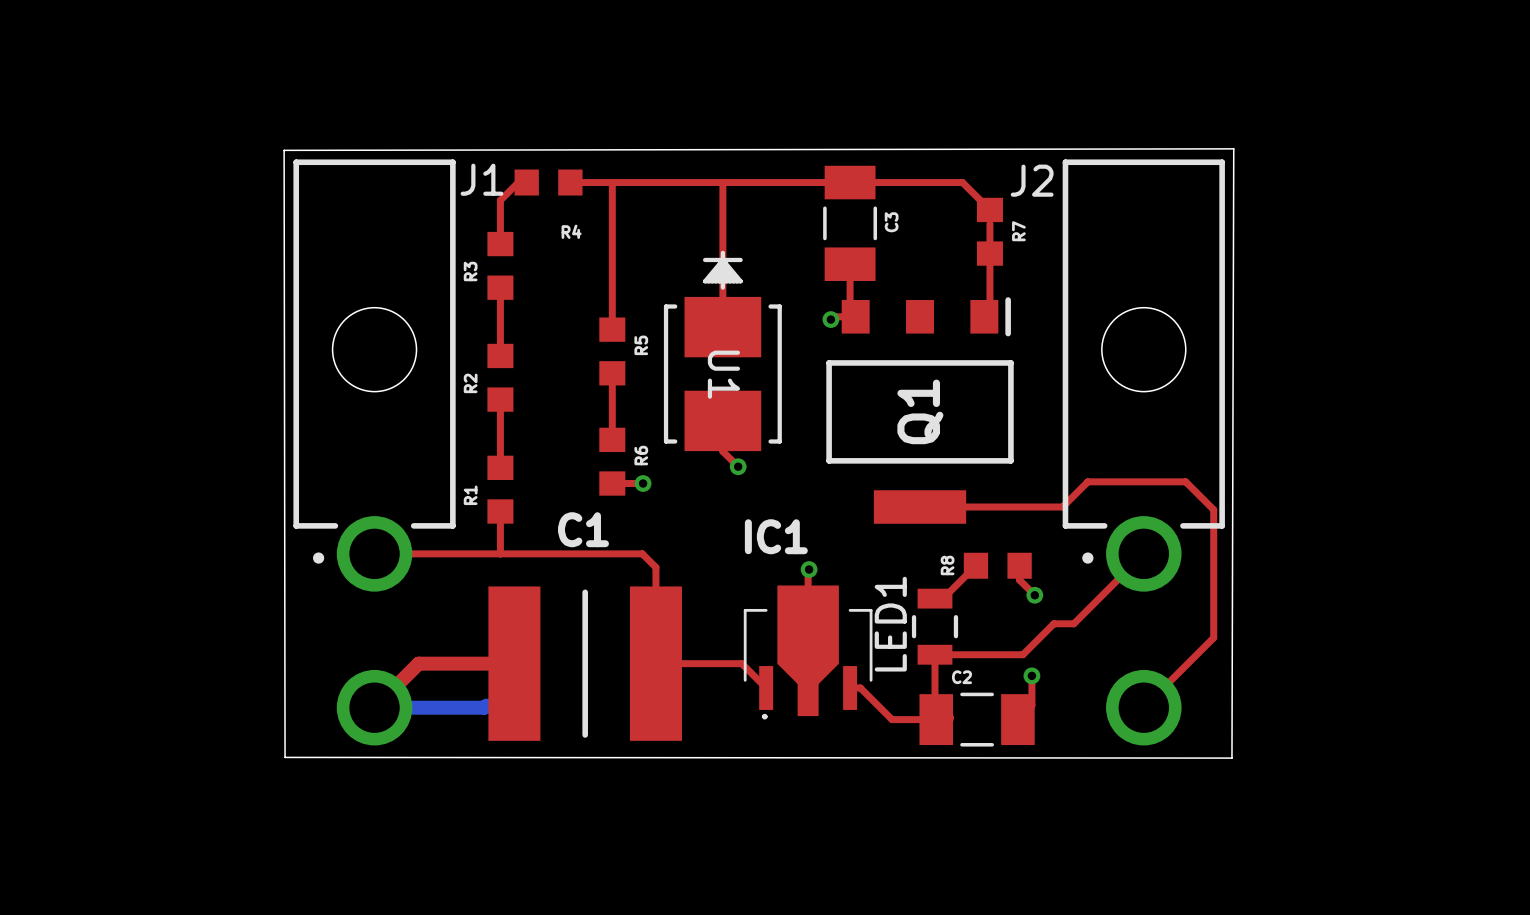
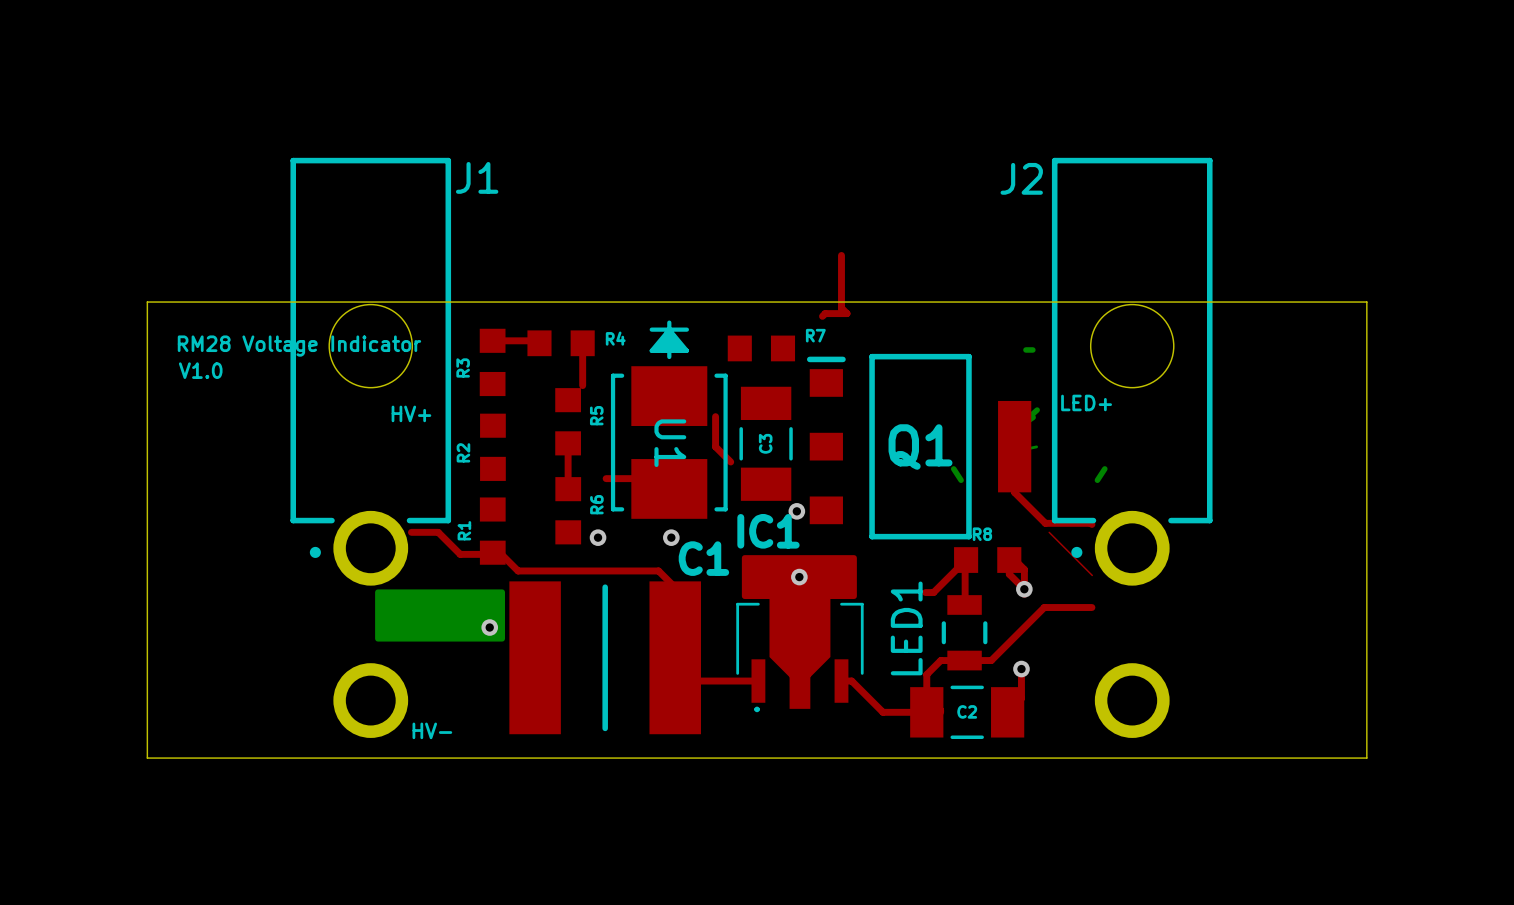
board edge: (1233, 148) (284, 150) (285, 757) (1231, 758) (1233, 148) -> (147, 302) (147, 758) (1366, 758) (1366, 302) (147, 302)
top track: (526, 182) (518, 182) (500, 200) (500, 244) -> none
R4 position: (548, 182) -> (561, 343)
top track: (570, 182) (962, 182) (989, 209) -> none
top track: (611, 182) (612, 329) -> none
top track: (722, 182) (722, 327) -> none
C3 name position: C3 (891, 222) -> C3 (765, 443)
C3 position: (850, 223) -> (766, 443)
top track: (989, 223) (989, 311) (984, 316) -> none
R4 name position: R4 (571, 231) -> R4 (615, 338)
R7 rotation: 0° (989, 231) -> 90° clockwise (761, 348)
R7 position: (989, 231) -> (761, 348)
R3 position: (500, 265) -> (492, 362)
top track: (500, 287) (500, 355) -> none
via: (830, 319) -> none
top track: none -> (492, 340) (537, 340) (539, 343)
text: none -> RM28 Voltage Indicator (299, 346)
U1 position: (722, 350) -> (669, 419)
drawing: none -> [950, 347, 1108, 484]
R5 position: (612, 351) -> (568, 421)
top track: (612, 373) (612, 439) -> none
text: none -> V1.0 (200, 370)
R2 position: (500, 377) -> (492, 447)
top track: (500, 399) (500, 467) -> none
text: none -> LED+ (1086, 402)
Q1 rotation: 0° (920, 410) -> 90° counterclockwise (919, 446)
text: none -> HV+ (411, 413)
top track: none -> (568, 443) (568, 489)
top track: none -> (1014, 446) (1014, 492) (1045, 523) (1091, 524)
R6 position: (612, 461) -> (568, 510)
via: (738, 466) -> none
via: (643, 483) -> none
R1 position: (500, 489) -> (492, 531)
R1 name position: R1 (470, 495) -> R1 (464, 530)
top track: (920, 507) (1062, 507) (1087, 481) (1185, 481) (1213, 509) (1213, 637) (1143, 707) -> none
top track: (500, 511) (500, 553) -> (582, 343) (582, 385)
via: none -> (796, 511)
C1 name position: C1 (583, 529) -> C1 (703, 558)
top track: none -> (1049, 532) (1092, 575)
via: none -> (598, 537)
via: none -> (671, 537)
top track: (374, 553) (642, 553) (655, 567) (655, 663) (741, 663) (766, 687) -> (411, 532) (438, 532) (460, 554) (499, 552) (518, 570) (658, 570) (675, 587) (675, 657) (698, 681) (758, 681)
top track: (1143, 553) (1073, 623) (1053, 623) (1022, 654) (935, 654) (935, 718) -> none
drawing: none -> [741, 555, 857, 600]
R8 name rotation: 0° (947, 565) -> 90° clockwise (982, 534)
R8 name position: R8 (947, 565) -> R8 (982, 534)
top track: none -> (1016, 561) (1024, 569) (1024, 594)
top track: none -> (970, 562) (965, 567) (965, 600)
via position: (809, 569) -> (799, 577)
drawing: none -> [375, 589, 506, 642]
top track: none -> (1091, 607) (1044, 607) (991, 660) (940, 660) (926, 674) (926, 712)
LED1 name position: LED1 (890, 624) -> LED1 (906, 628)
LED1 position: (935, 626) -> (964, 632)
via: none -> (489, 627)
top track: (514, 663) (418, 663) (374, 707) -> none
C1 position: (585, 663) -> (605, 657)
C2 name position: C2 (961, 677) -> C2 (967, 711)
bottom track: (486, 705) (484, 707) (374, 707) -> none
text: none -> HV- (432, 730)

